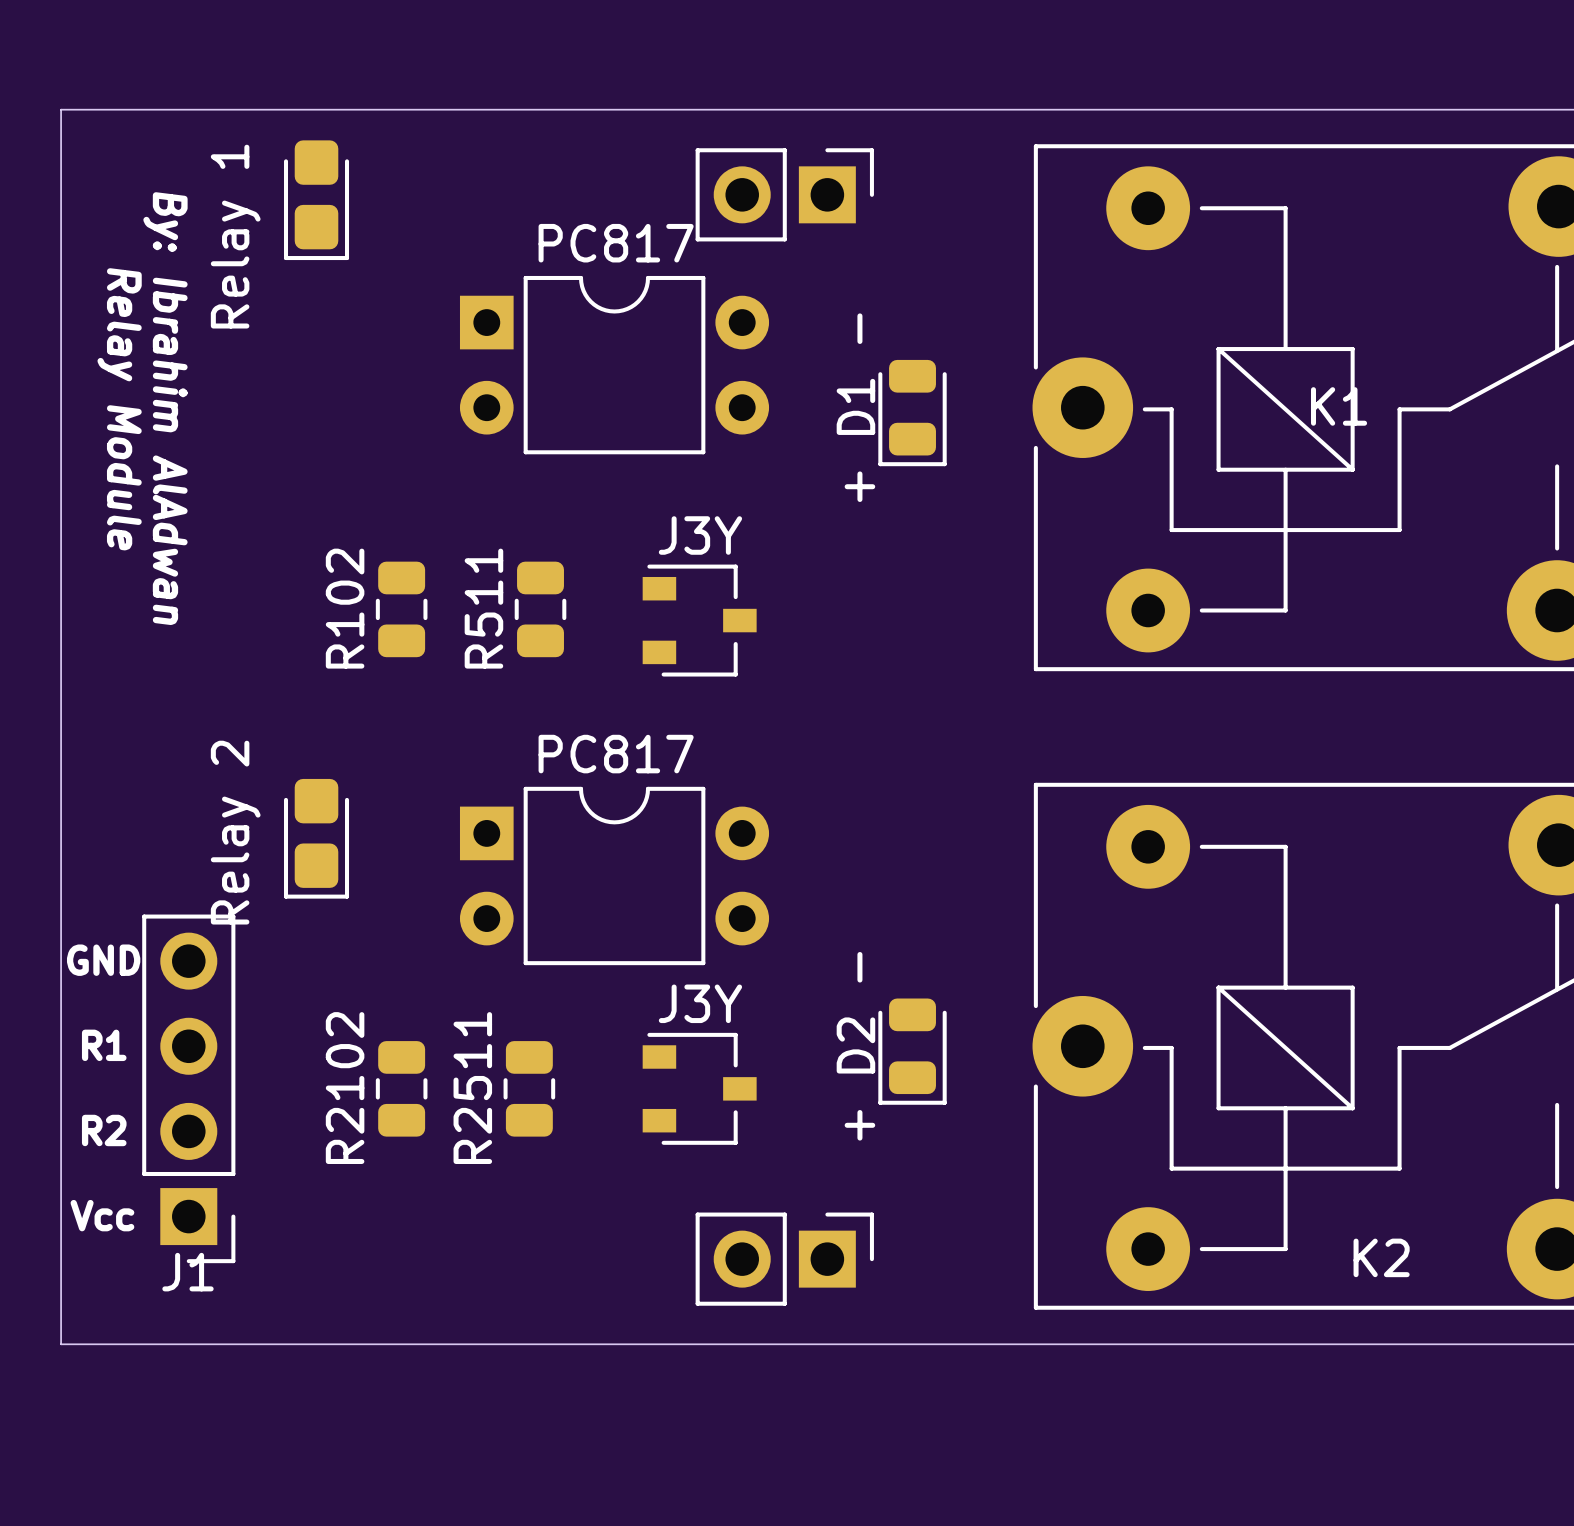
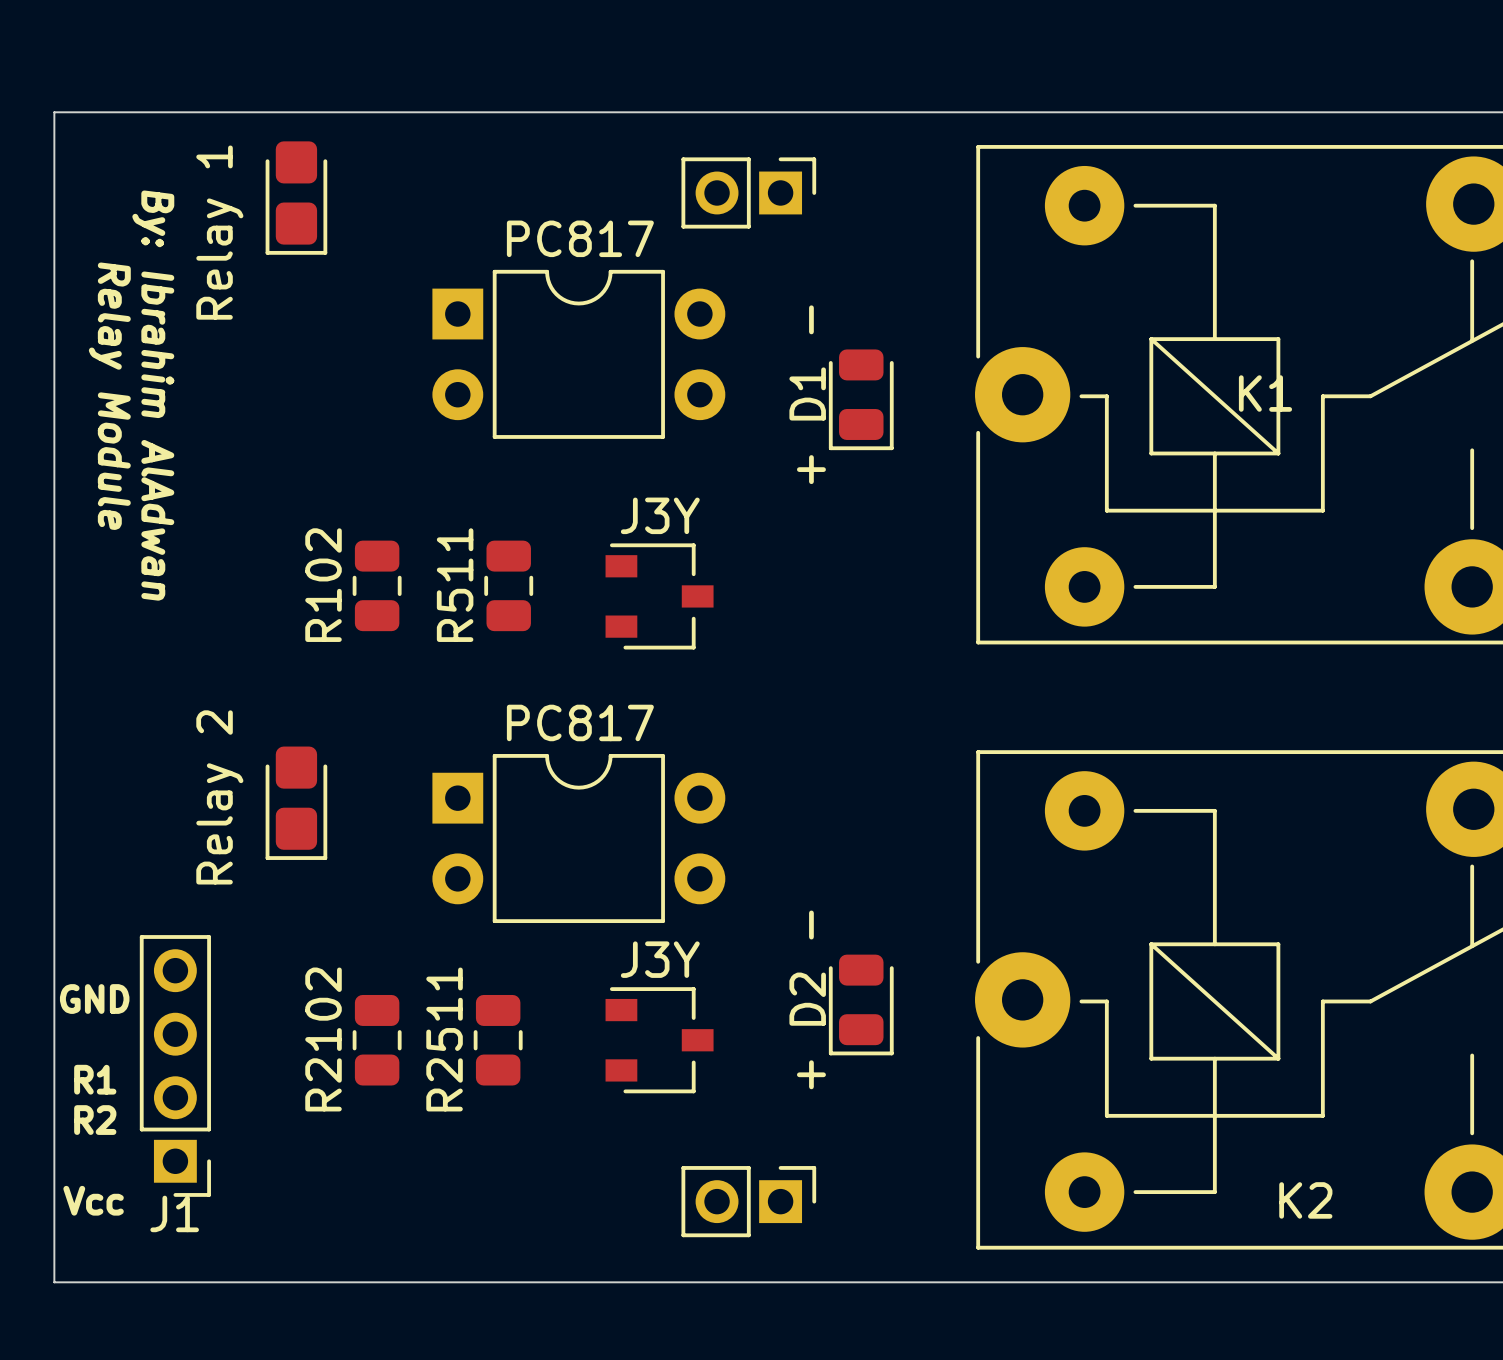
part footprint: [695, 148, 874, 242] -> [681, 157, 817, 229]
J1 footprint: [142, 914, 236, 1264] -> [139, 935, 211, 1197]
text: GND (103, 960) -> none
text: R1 (104, 1045) -> GND (94, 999)
text: R2 (104, 1130) -> R1 (95, 1079)
text: none -> R2 (95, 1120)
part footprint: [695, 1212, 874, 1306] -> [681, 1166, 817, 1238]
text position: Vcc (102, 1215) -> Vcc (93, 1200)

